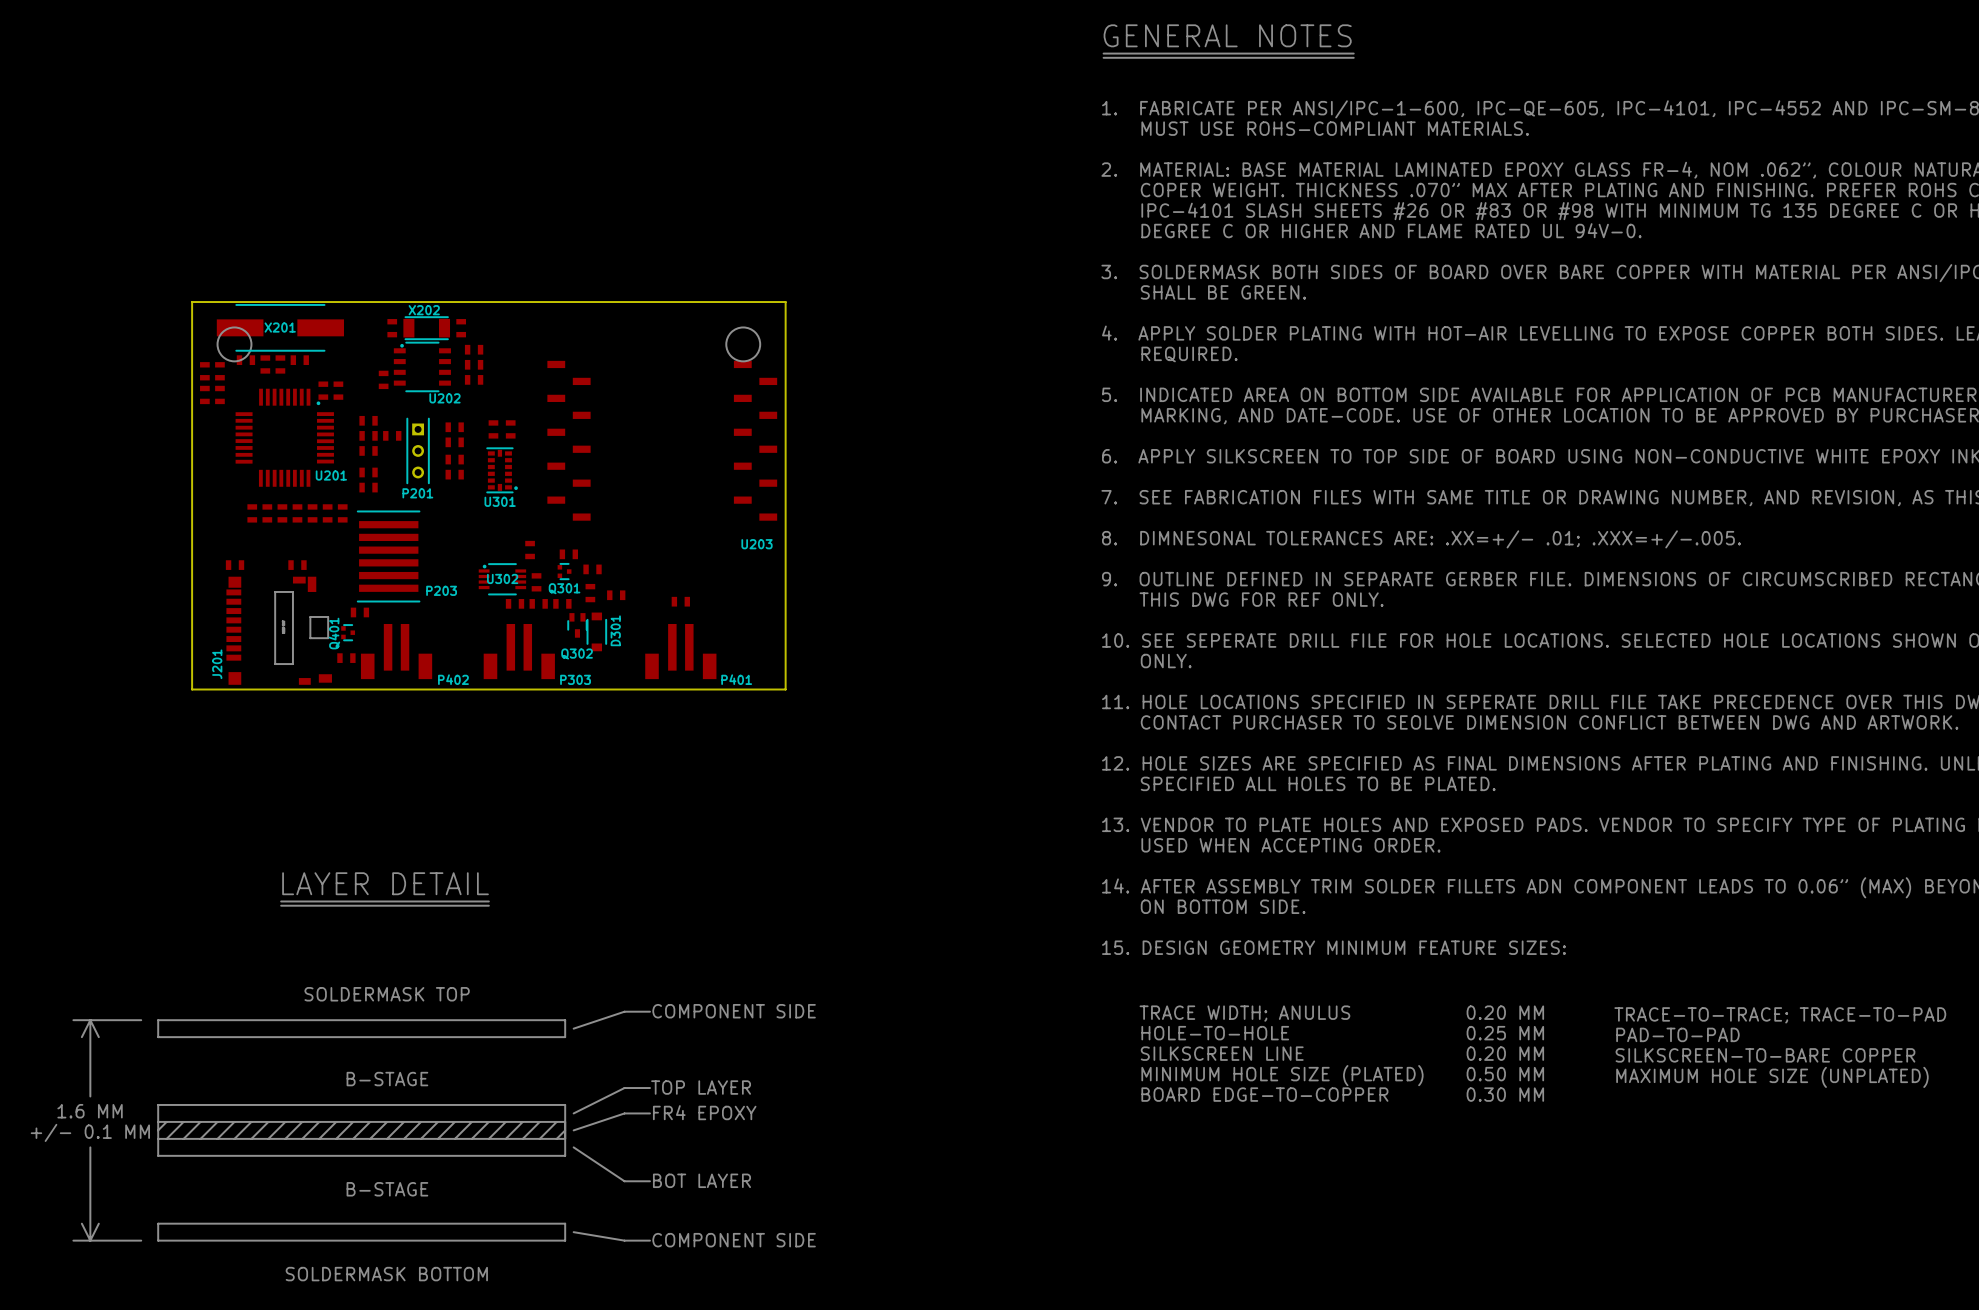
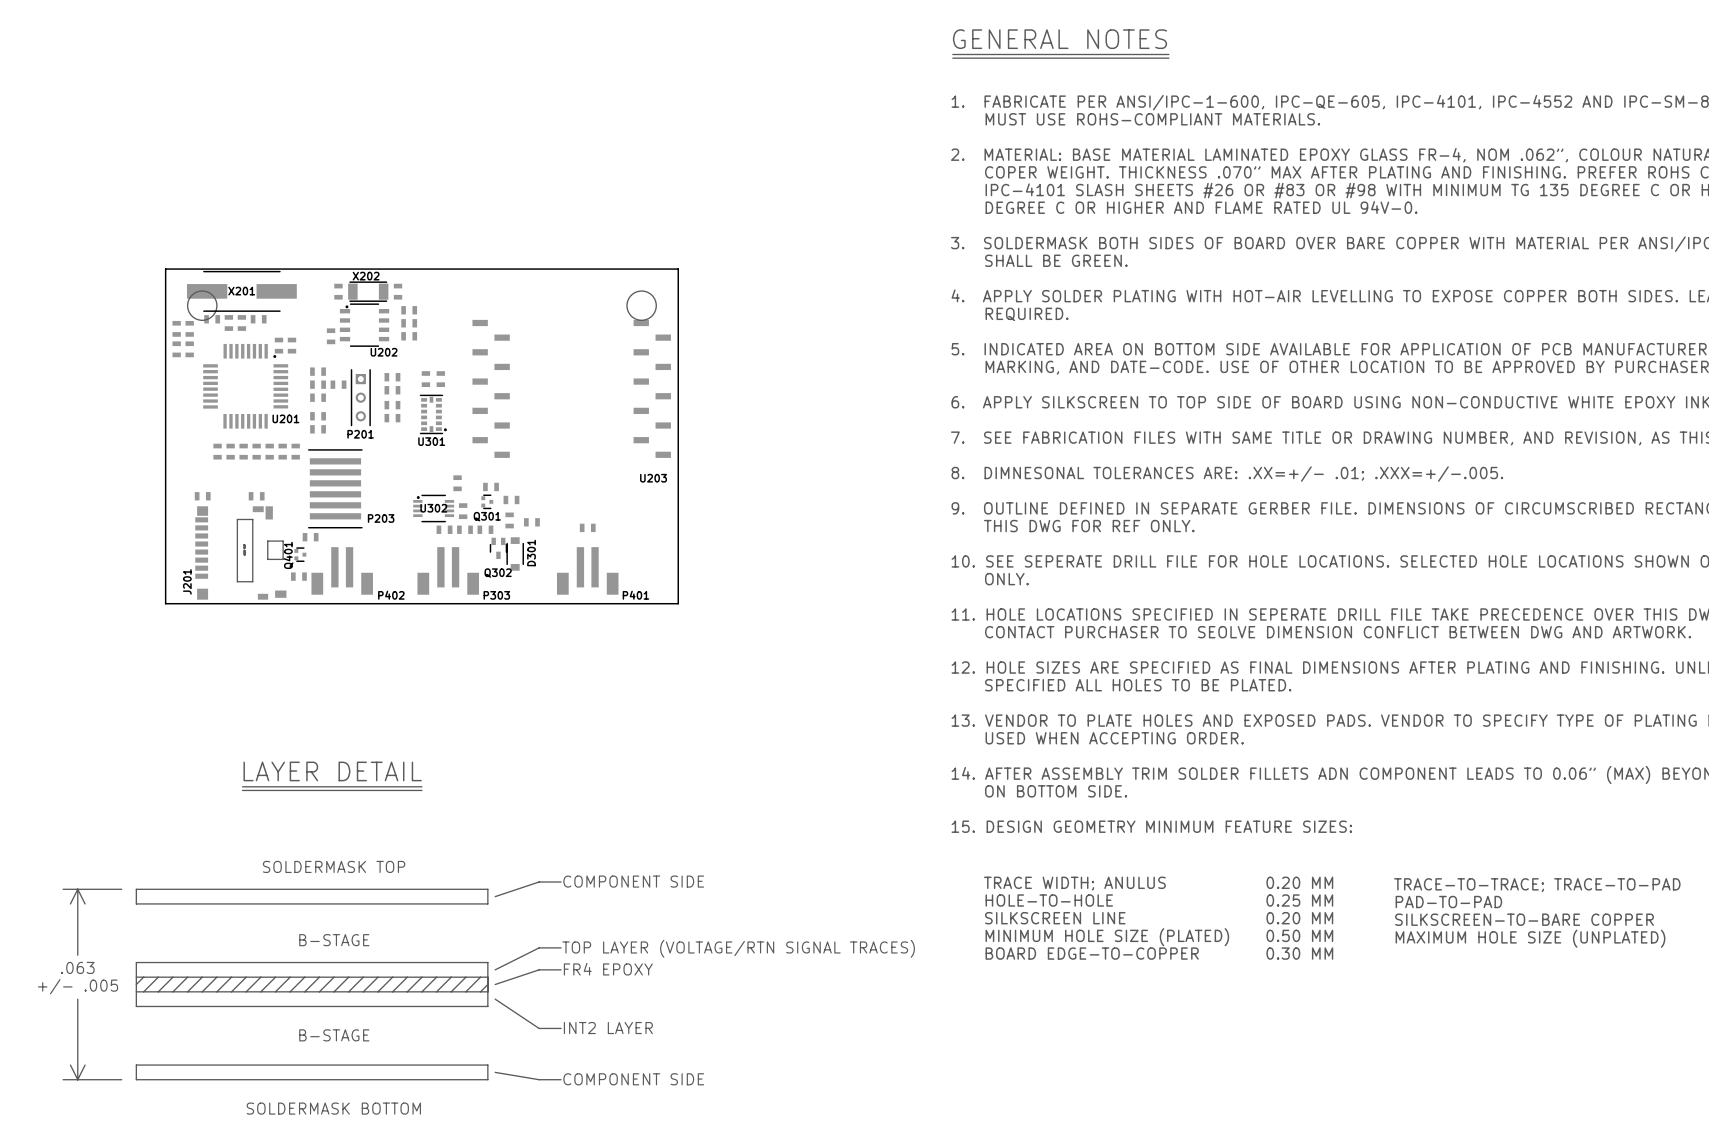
text: TOP LAYER (701, 1087) -> TOP LAYER (VOLTAGE/RTN SIGNAL TRACES) (738, 948)
text: 1.6 MM (90, 1111) -> .063 (77, 967)
text: +/- 0.1 MM (90, 1132) -> +/- .005 (78, 986)
text: BOT LAYER (701, 1180) -> INT2 LAYER (608, 1028)

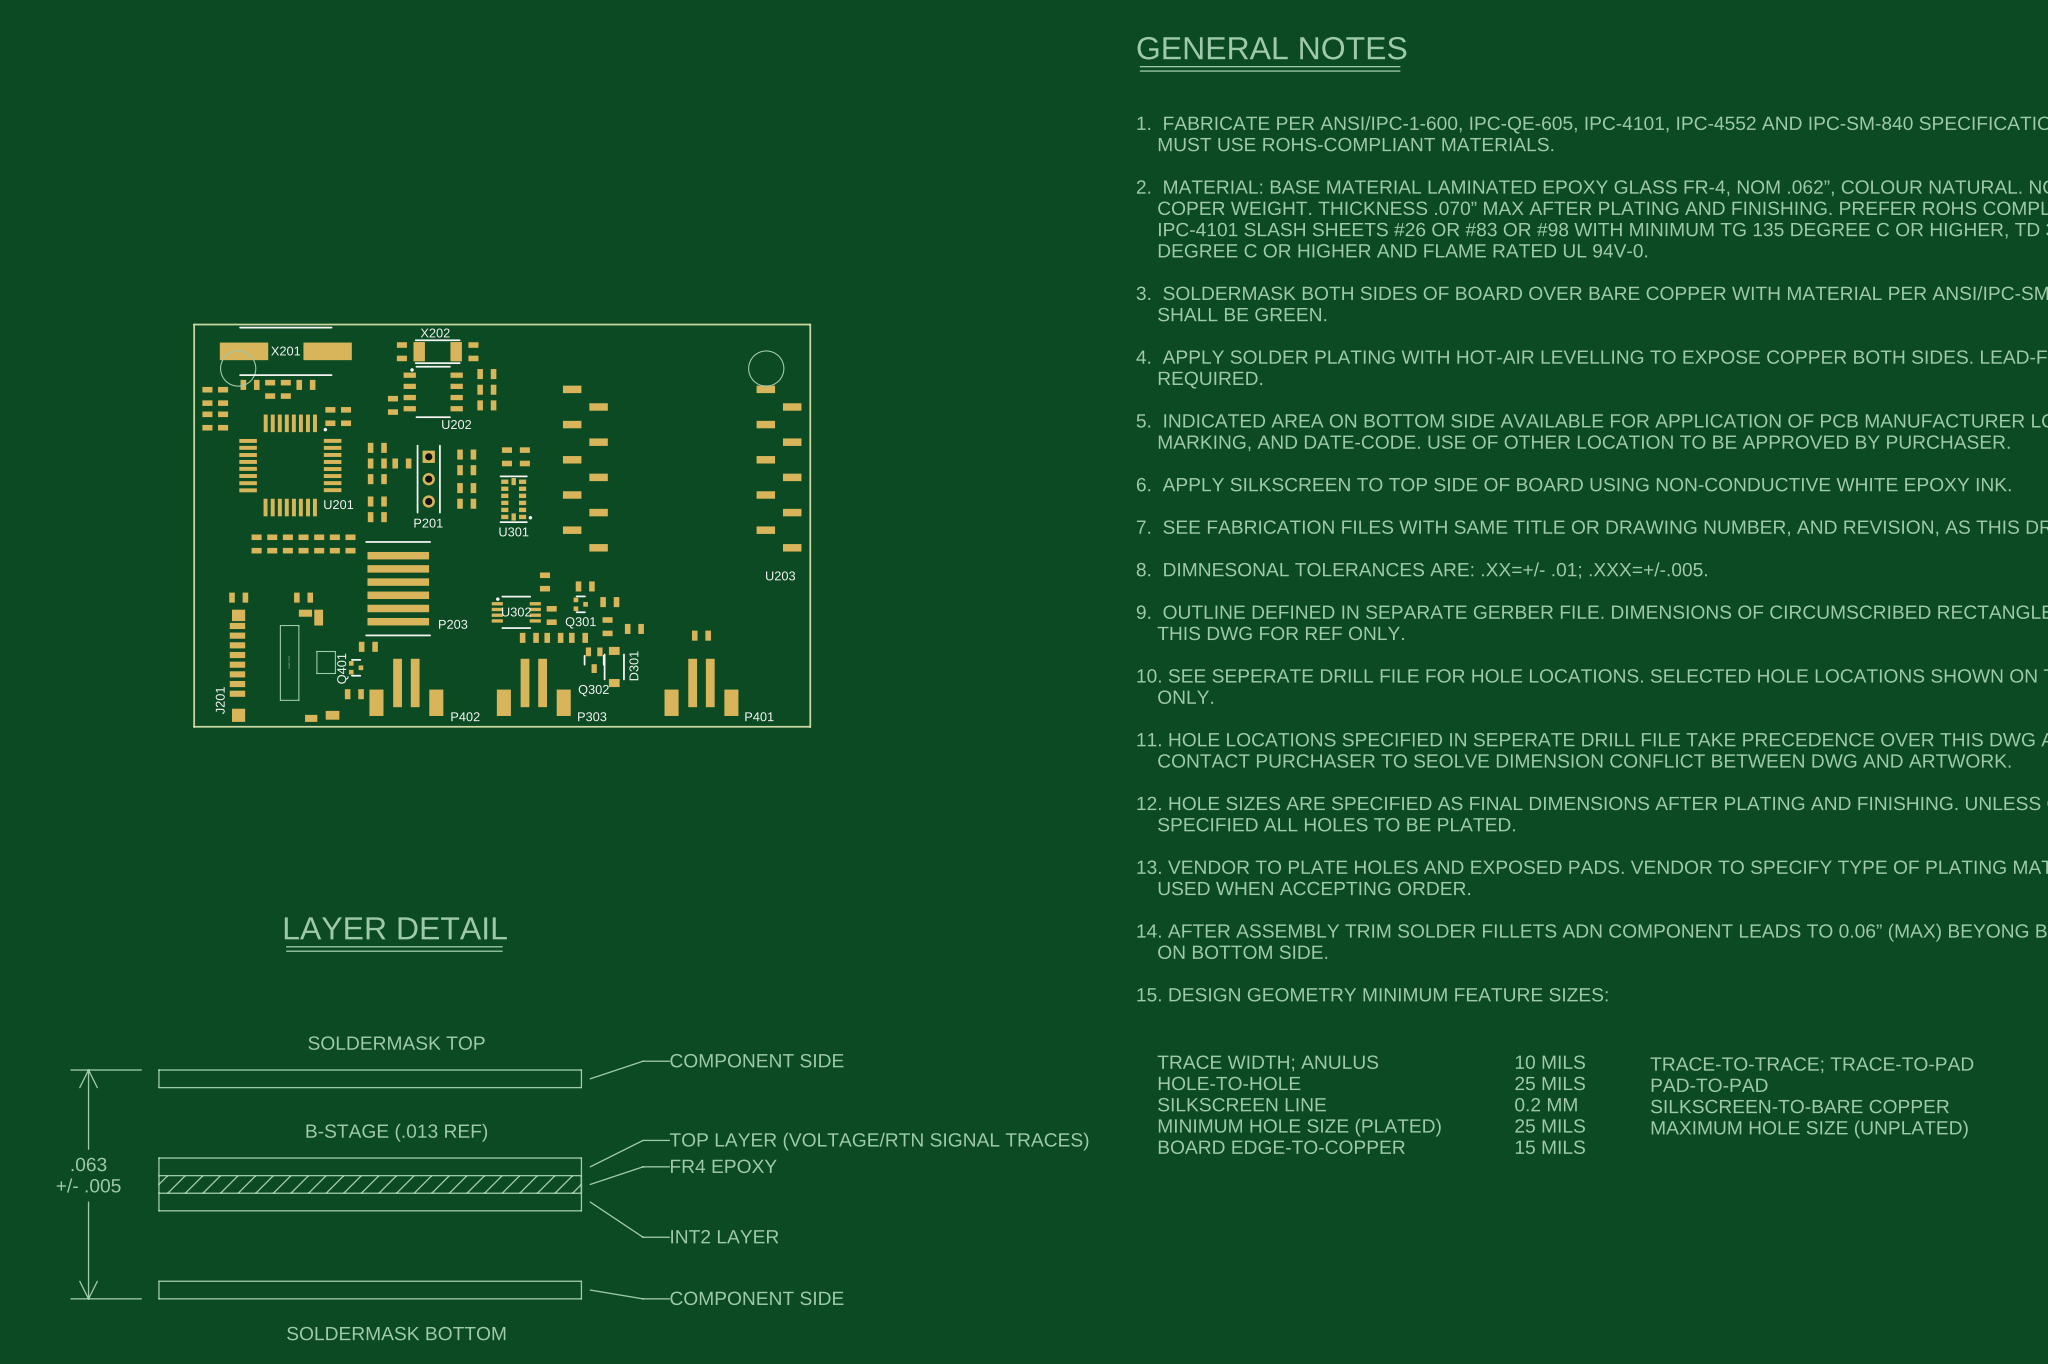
text: 0.20 MM (1299, 882) -> 10 MILS (1550, 1062)
text: 0.25 MM (1299, 900) -> 25 MILS (1550, 1083)
text: 0.20 MM (1299, 918) -> 0.2 MM (1545, 1104)
text: 0.50 MM (1299, 935) -> 25 MILS (1550, 1125)
text: B-STAGE (334, 940) -> B-STAGE (.013 REF) (396, 1132)
text: 0.30 MM (1299, 953) -> 15 MILS (1550, 1147)
text: B-STAGE (334, 1035) -> none

